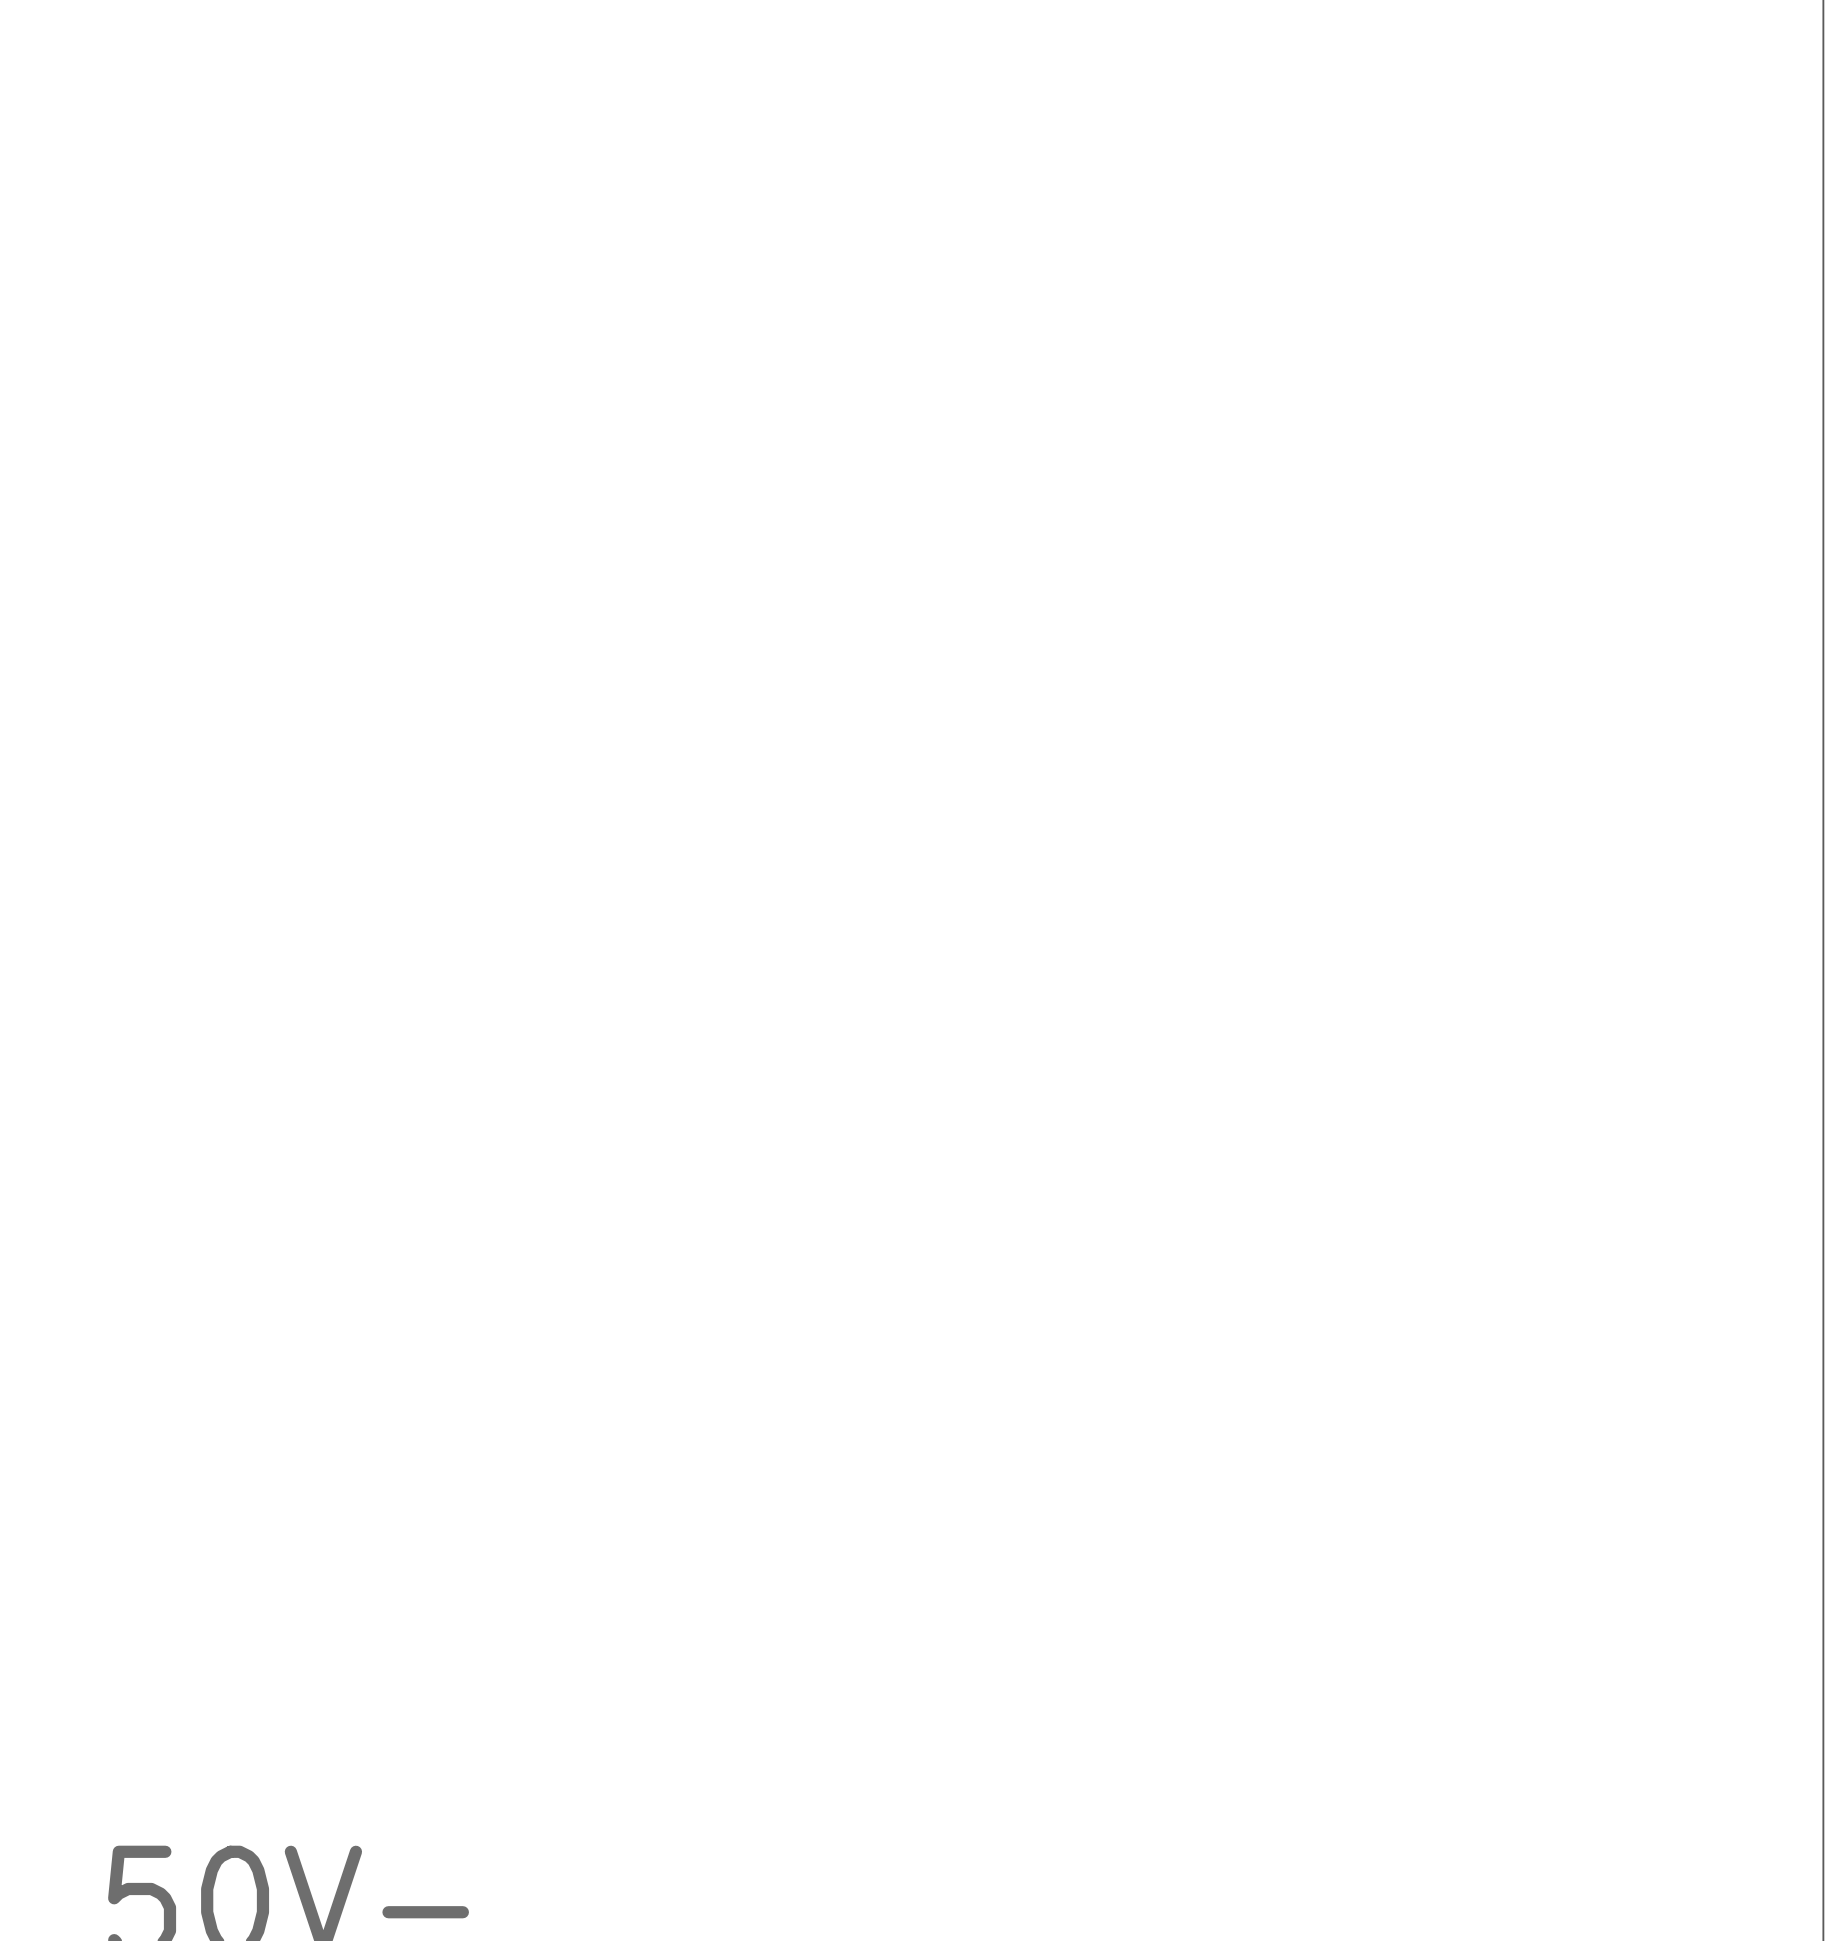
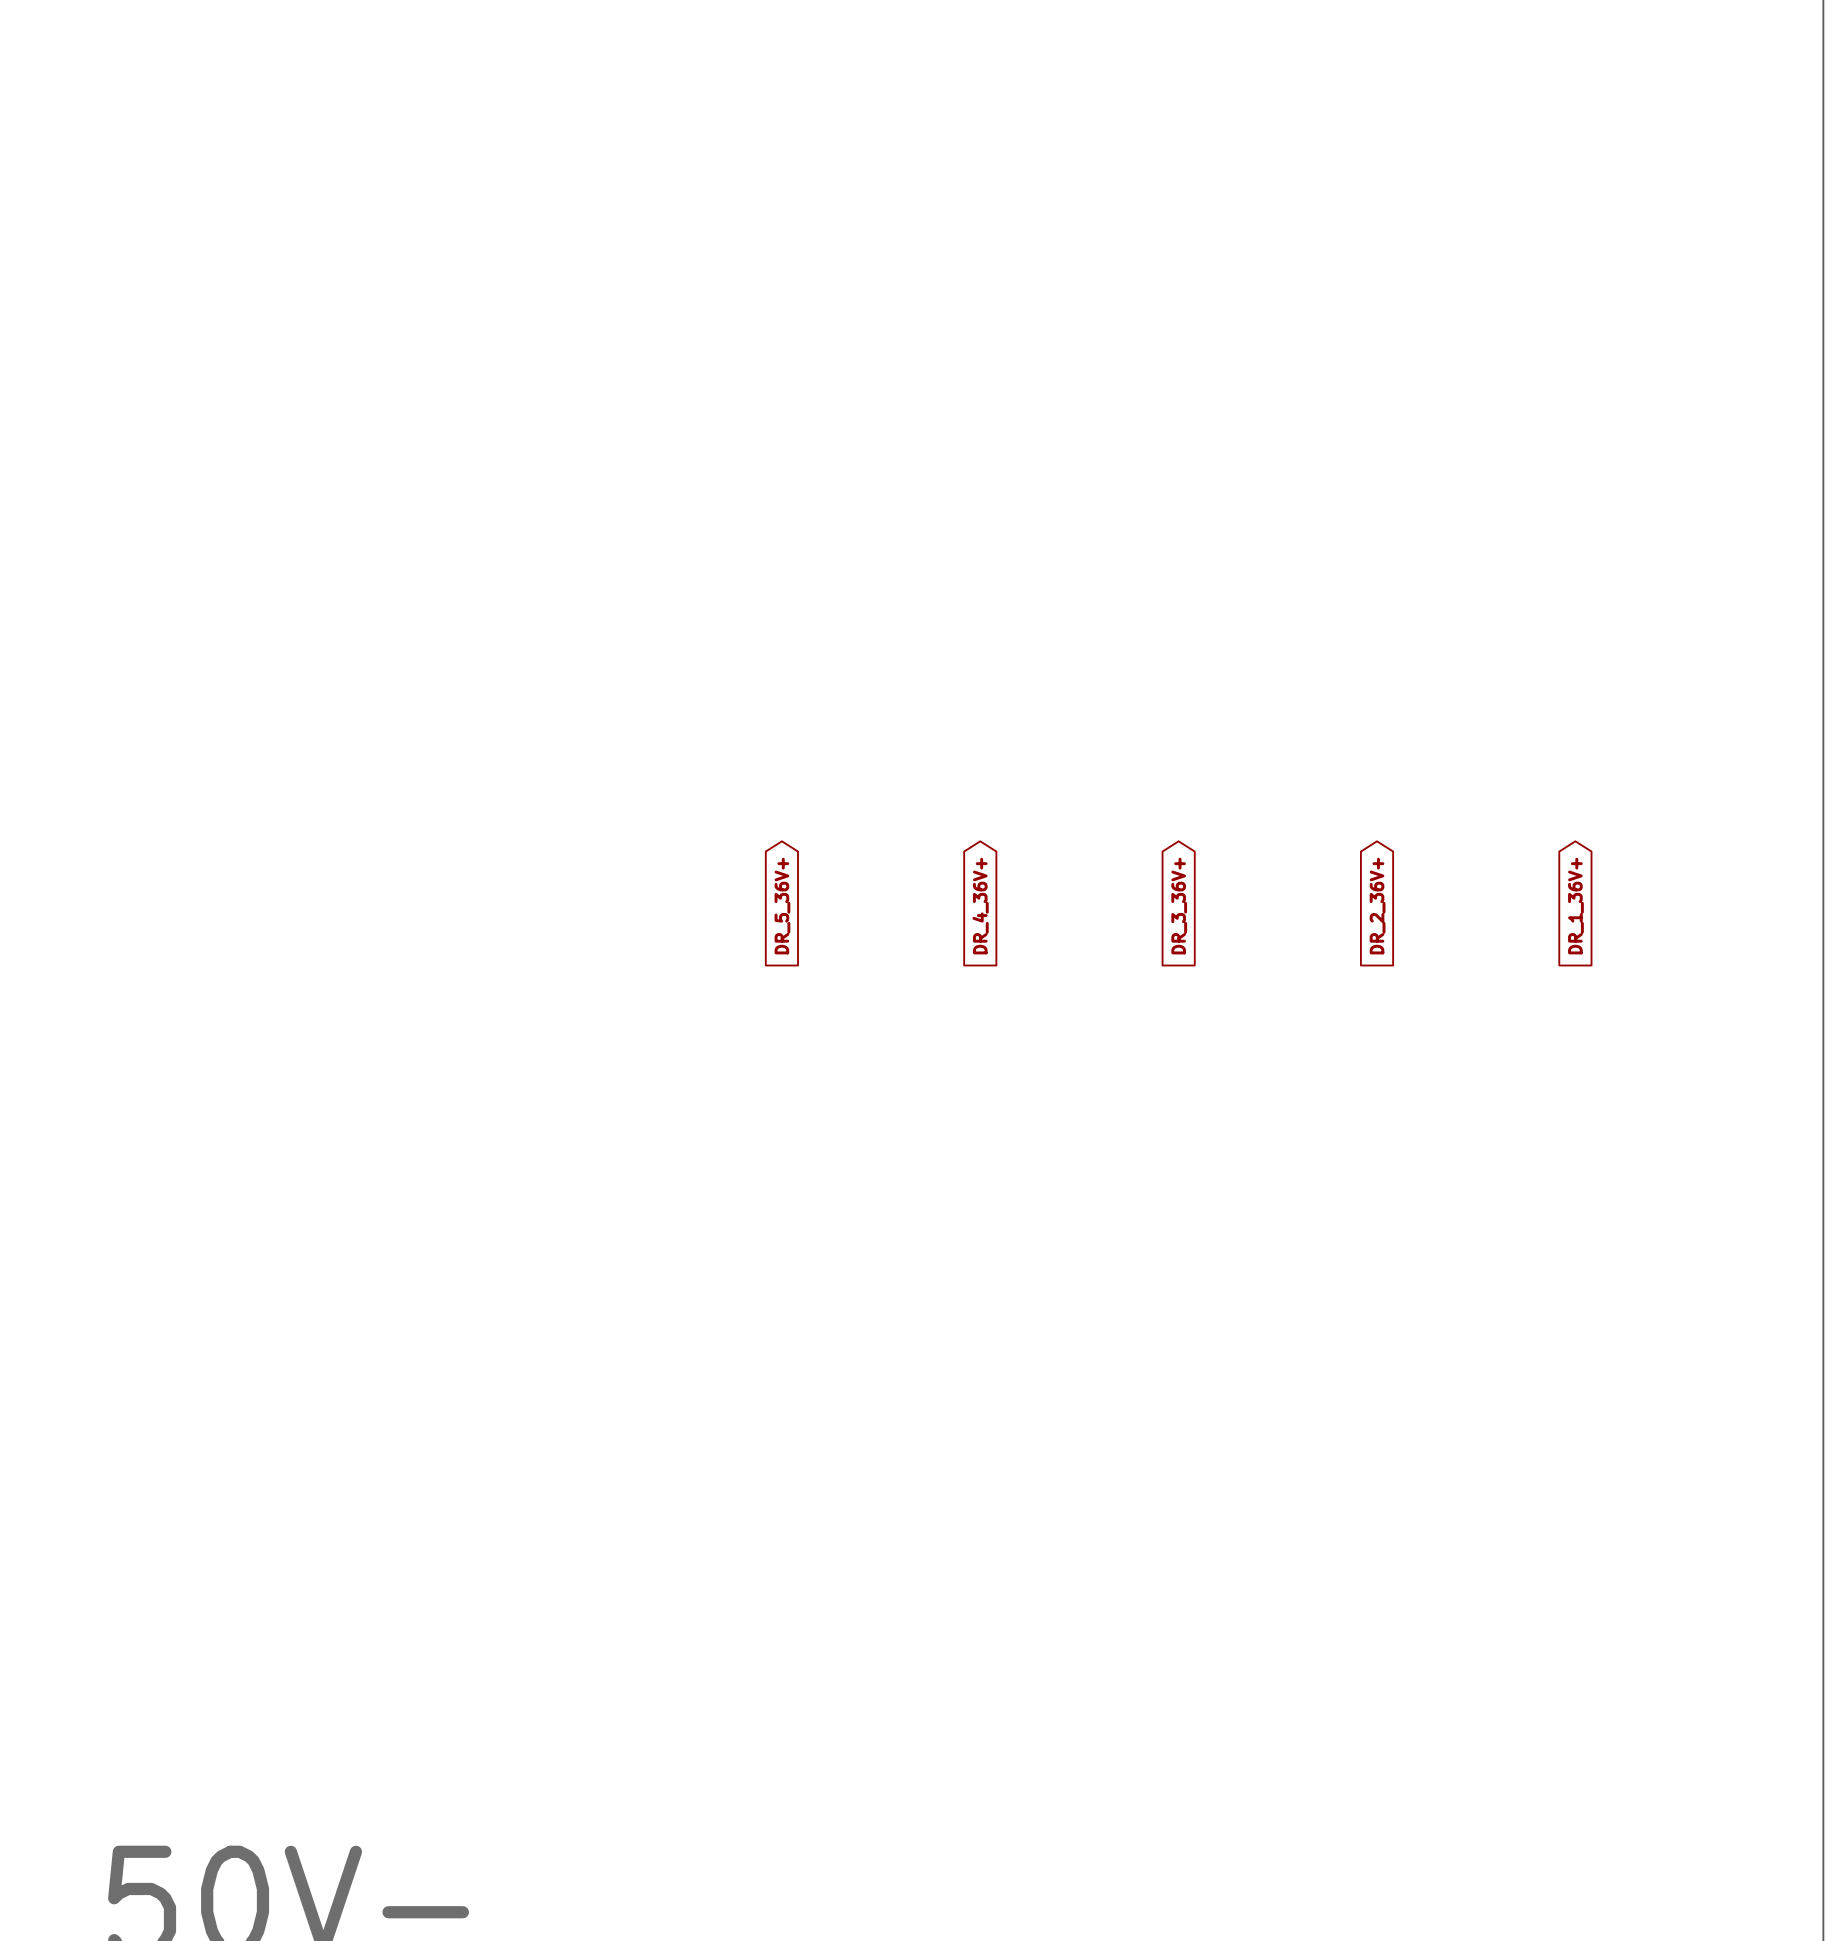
global label: none -> DR_5_36V+ (782, 906)
global label: none -> DR_4_36V+ (980, 906)
global label: none -> DR_3_36V+ (1179, 906)
global label: none -> DR_2_36V+ (1377, 906)
global label: none -> DR_1_36V+ (1575, 906)

